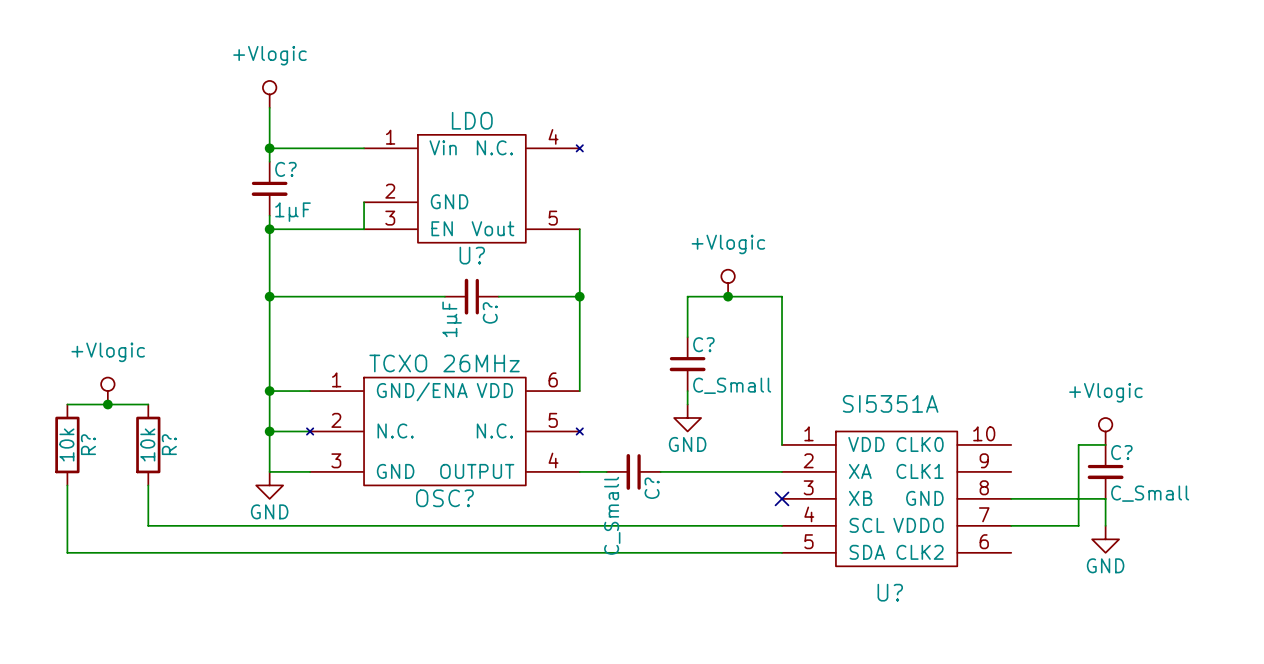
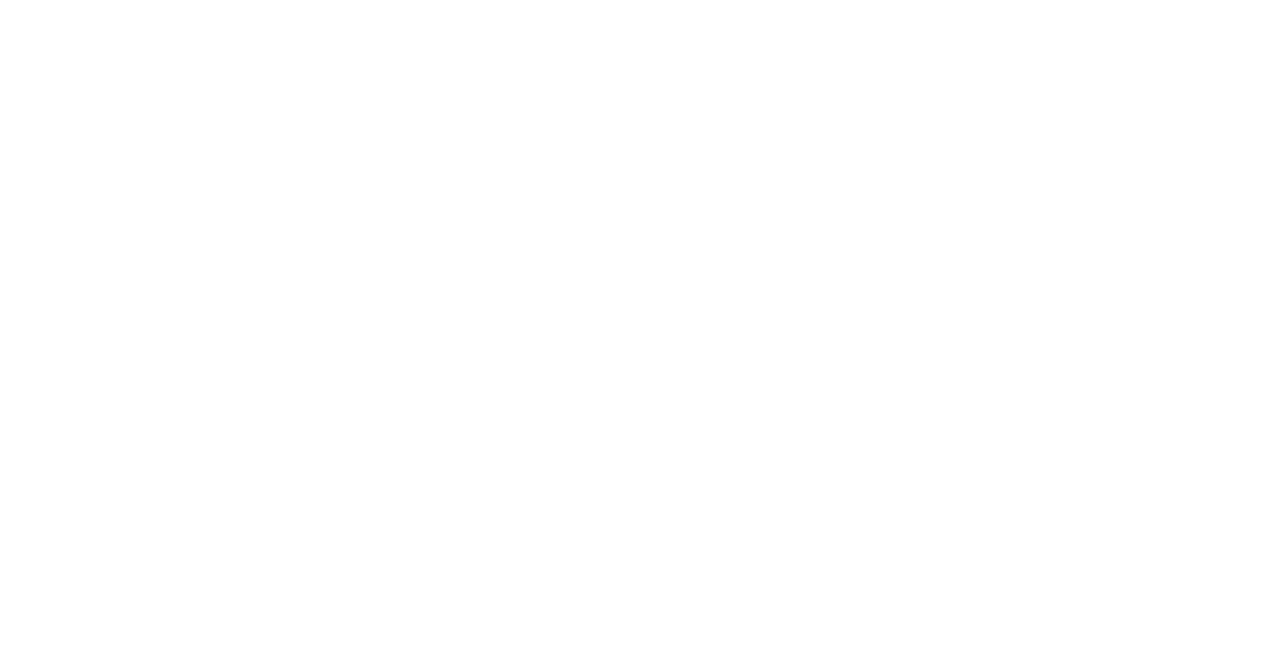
power symbol: +Vlogic (269, 94) -> none
wire: (269, 107) (269, 161) -> none
wire: (269, 148) (364, 148) -> none
junction: (269, 148) -> none
C?: 1µF (269, 188) -> none
U?: LDO (473, 188) -> none
wire: (364, 202) (364, 229) (269, 229) -> none
wire: (269, 215) (269, 471) (310, 471) -> none
junction: (269, 229) -> none
wire: (579, 229) (579, 391) -> none
power symbol: +Vlogic (728, 283) -> none
wire: (269, 296) (444, 296) -> none
junction: (269, 296) -> none
C?: 1µF (471, 296) -> none
wire: (498, 296) (579, 296) -> none
junction: (579, 296) -> none
junction: (728, 296) -> none
wire: (687, 337) (687, 296) (782, 296) (782, 444) -> none
C?: C_Small (687, 364) -> none
power symbol: +Vlogic (107, 391) -> none
wire: (269, 391) (310, 391) -> none
junction: (269, 391) -> none
wire: (687, 391) (687, 404) -> none
wire: (67, 404) (148, 404) -> none
junction: (107, 404) -> none
power symbol: GND (687, 418) -> none
wire: (269, 431) (310, 431) -> none
junction: (269, 431) -> none
OSC?: TCXO 26MHz (444, 431) -> none
power symbol: +Vlogic (1105, 431) -> none
R?: 10k (67, 444) -> none
R?: 10k (148, 444) -> none
wire: (1105, 444) (1078, 444) (1078, 525) (1011, 525) -> none
wire: (579, 471) (606, 471) -> none
C?: C_Small (633, 471) -> none
wire: (660, 471) (782, 471) -> none
C?: C_Small (1105, 471) -> none
wire: (67, 485) (67, 552) (782, 552) -> none
wire: (148, 485) (148, 525) (782, 525) -> none
power symbol: GND (269, 485) -> none
no-connect mark: (782, 498) -> none
U?: SI5351A (896, 498) -> none
wire: (1011, 498) (1105, 498) (1105, 525) -> none
power symbol: GND (1105, 539) -> none

